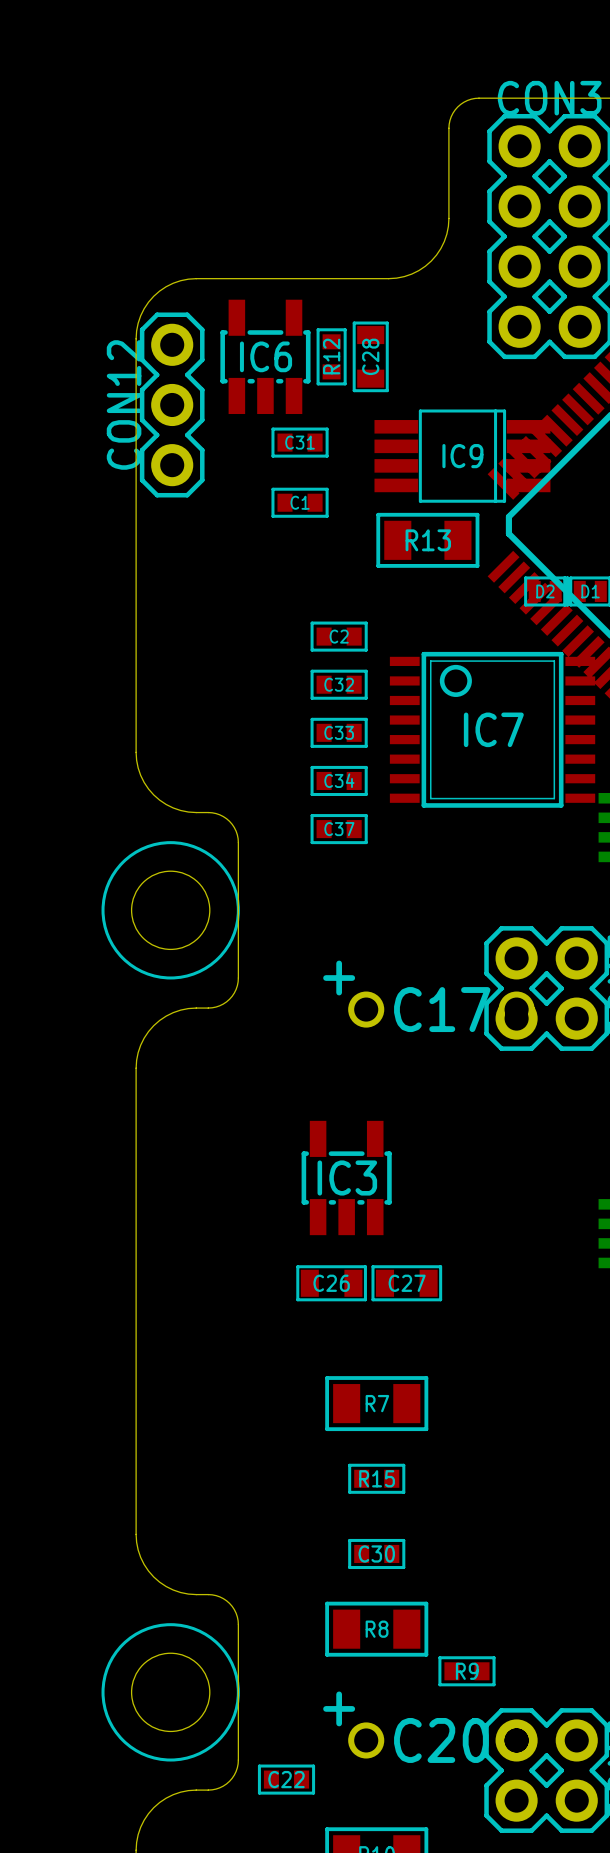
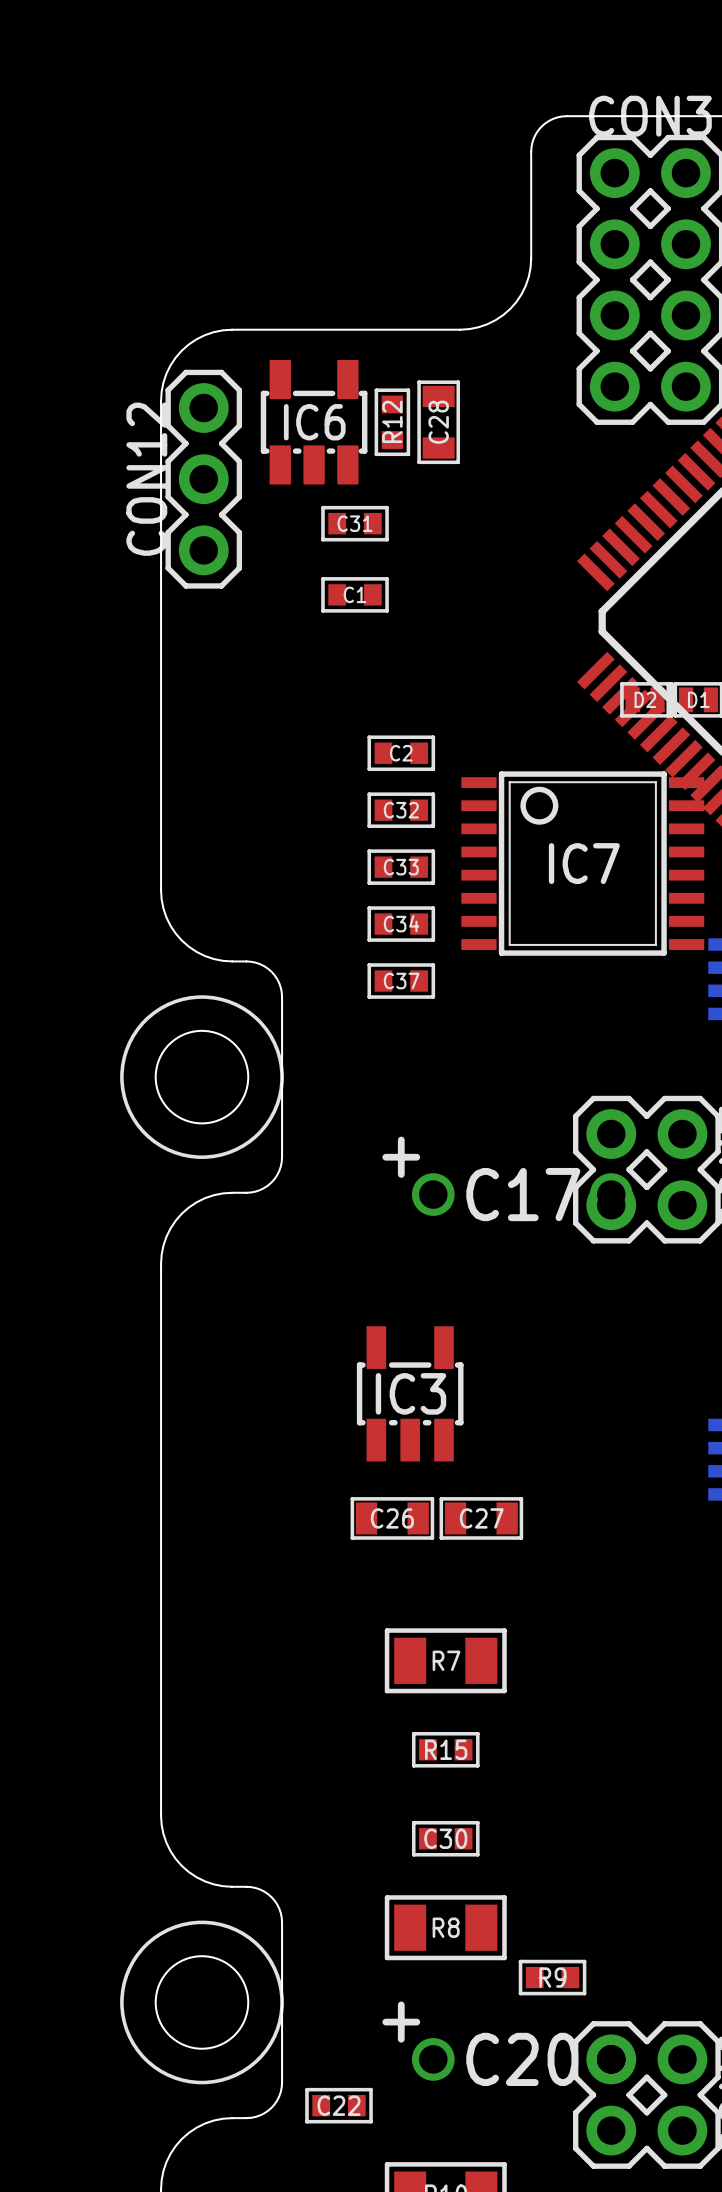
IC6 footprint: [220, 299, 311, 415] -> [260, 359, 368, 485]
IC9: (462, 456) -> none
R13: (427, 540) -> none

